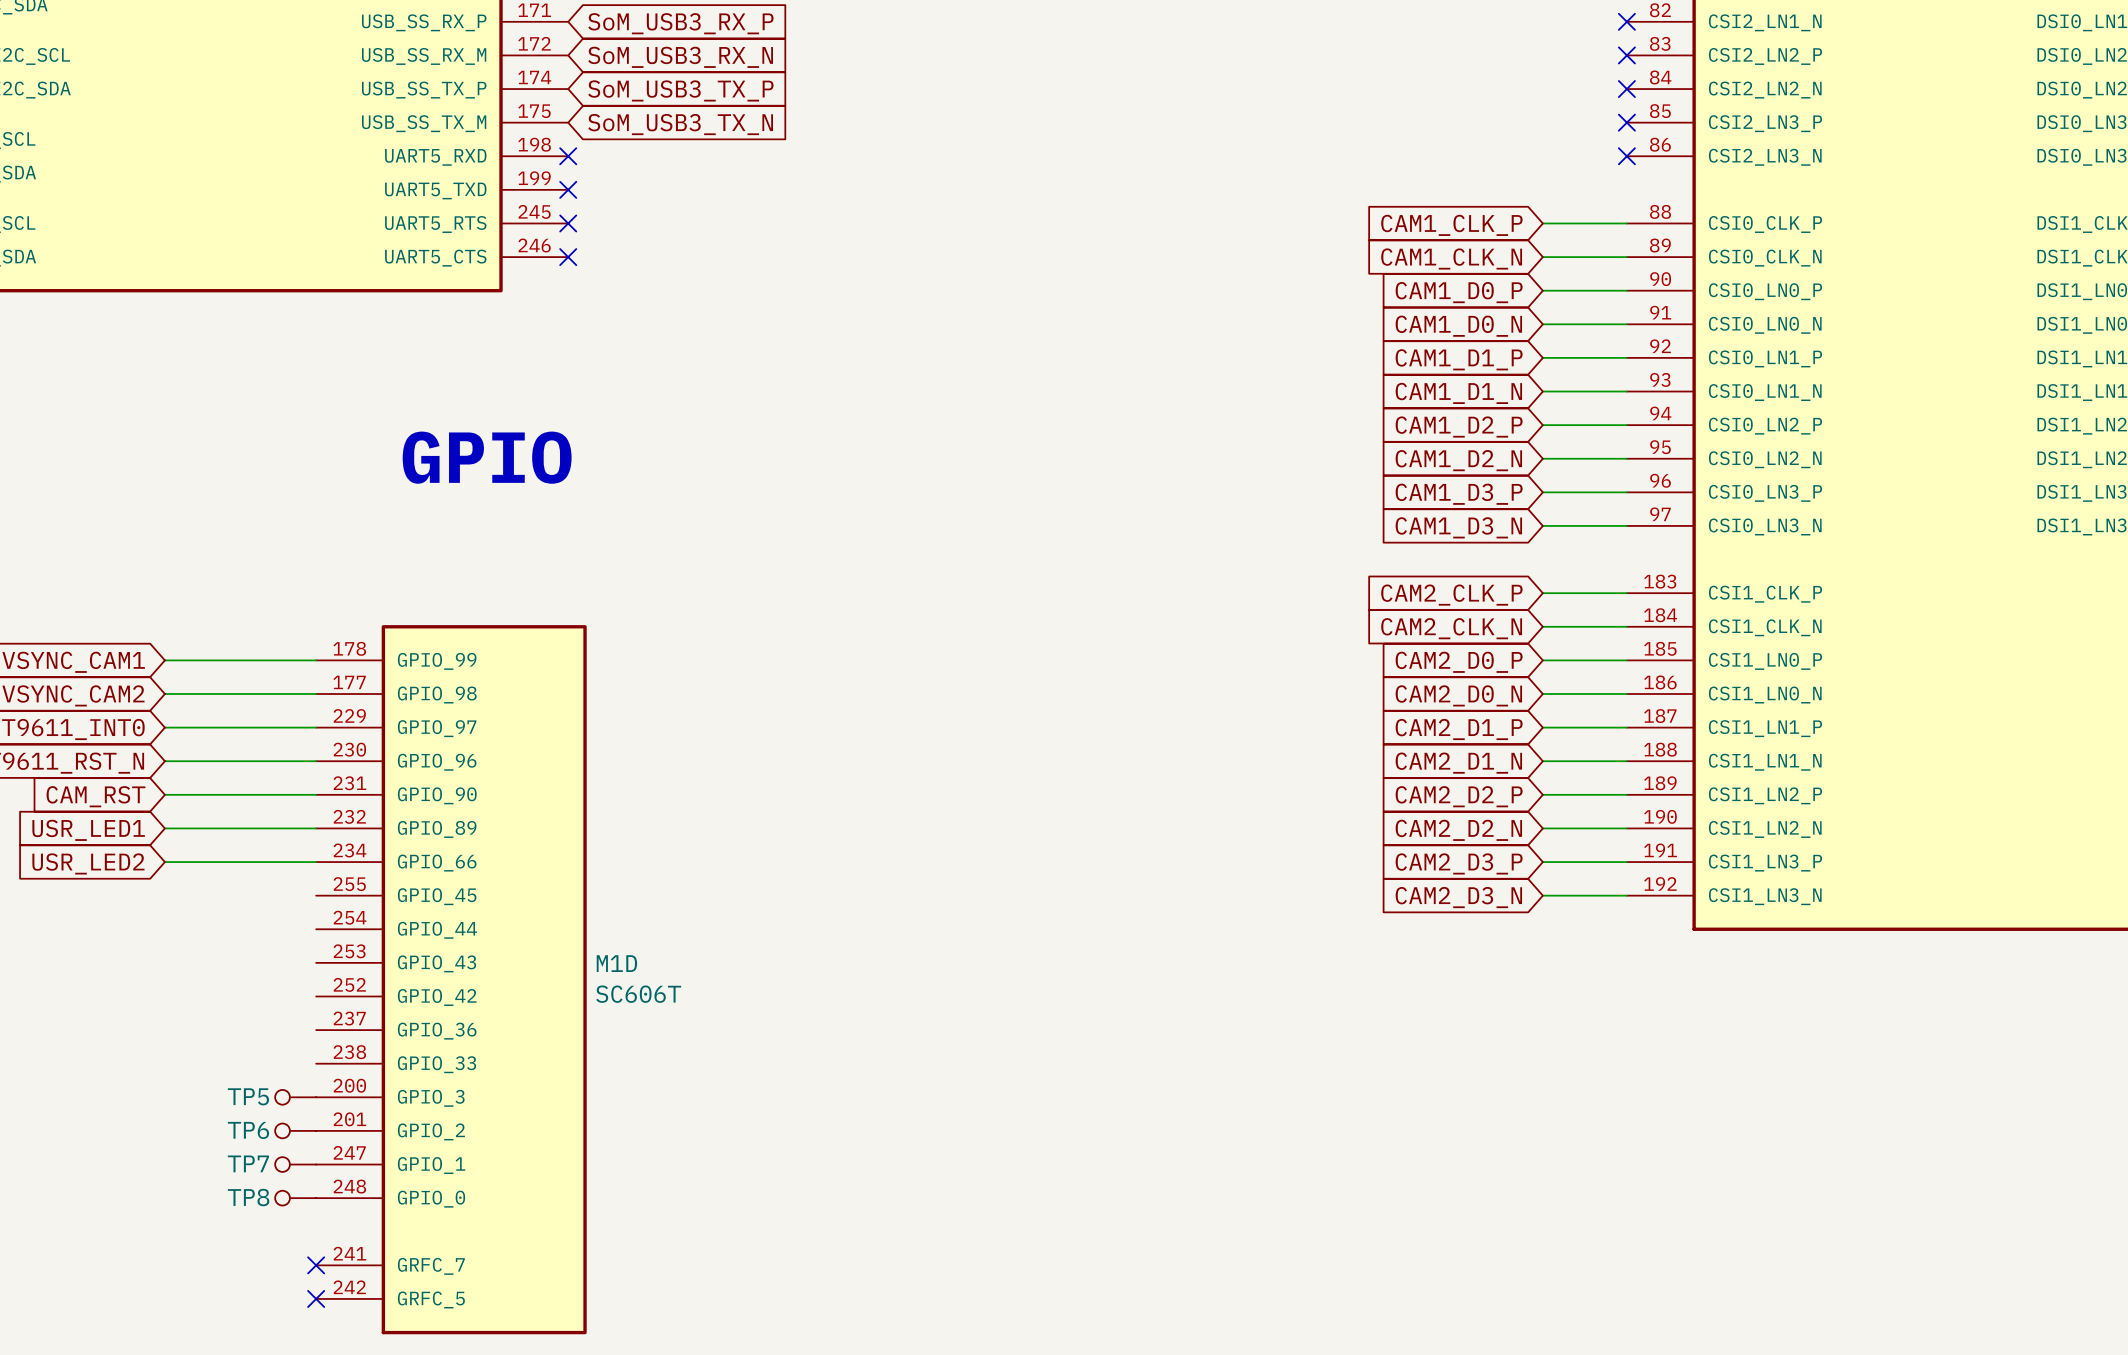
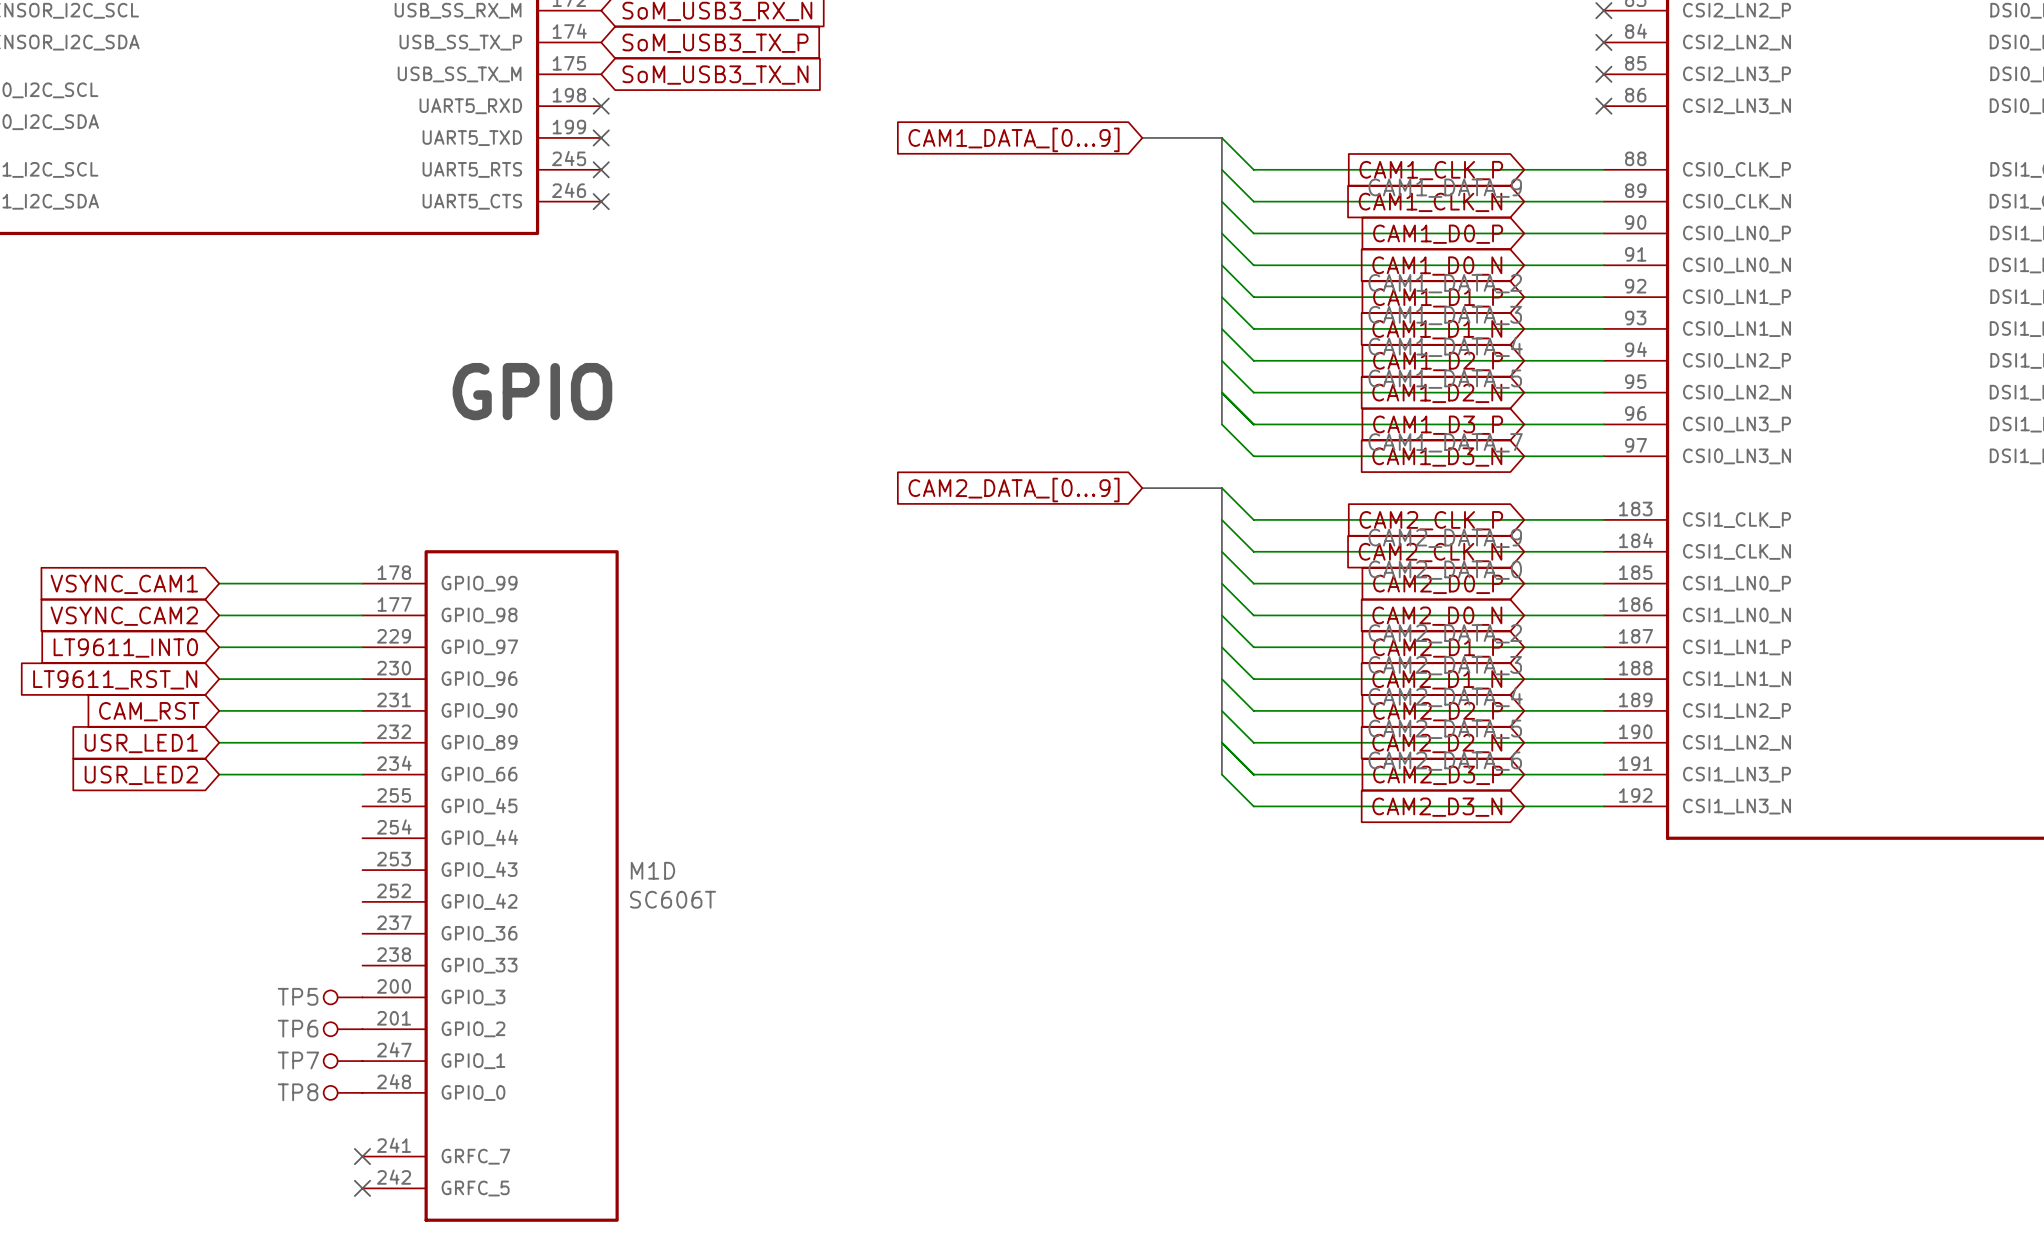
bus: none -> (1142, 137) (1221, 137) (1221, 424)
wire: none -> (1221, 137) (1253, 169) (1524, 169)
global label: none -> CAM1_DATA_[0...9] (1014, 139)
wire: none -> (1221, 169) (1253, 201) (1524, 201)
label: none -> CAM1_DATA_9 (1445, 188)
wire: none -> (1221, 201) (1253, 233) (1524, 233)
wire: none -> (1221, 233) (1253, 265) (1524, 265)
wire: none -> (1221, 265) (1253, 297) (1524, 297)
label: none -> CAM1_DATA_2 (1445, 283)
wire: none -> (1221, 297) (1253, 328) (1524, 328)
label: none -> CAM1_DATA_3 (1445, 315)
wire: none -> (1221, 328) (1253, 360) (1524, 360)
label: none -> CAM1_DATA_4 (1445, 346)
wire: none -> (1221, 360) (1253, 392) (1524, 392)
label: none -> CAM1_DATA_5 (1445, 379)
wire: none -> (1221, 392) (1253, 424) (1524, 424)
wire: none -> (1221, 424) (1253, 456) (1524, 456)
label: none -> CAM1_DATA_7 (1445, 442)
bus: none -> (1142, 488) (1221, 488) (1221, 774)
wire: none -> (1221, 488) (1253, 519) (1524, 519)
global label: none -> CAM2_DATA_[0...9] (1014, 490)
wire: none -> (1221, 519) (1253, 551) (1524, 551)
label: none -> CAM2_DATA_9 (1445, 538)
wire: none -> (1221, 551) (1253, 583) (1524, 583)
label: none -> CAM2_DATA_0 (1445, 570)
wire: none -> (1221, 583) (1253, 615) (1524, 615)
wire: none -> (1221, 615) (1253, 647) (1524, 647)
label: none -> CAM2_DATA_2 (1445, 633)
wire: none -> (1221, 647) (1253, 679) (1524, 679)
label: none -> CAM2_DATA_3 (1445, 665)
wire: none -> (1221, 679) (1253, 710) (1524, 710)
label: none -> CAM2_DATA_4 (1445, 697)
wire: none -> (1221, 710) (1253, 742) (1524, 742)
label: none -> CAM2_DATA_5 (1445, 729)
wire: none -> (1221, 742) (1253, 774) (1524, 774)
label: none -> CAM2_DATA_6 (1445, 761)
wire: none -> (1221, 774) (1253, 806) (1524, 806)

